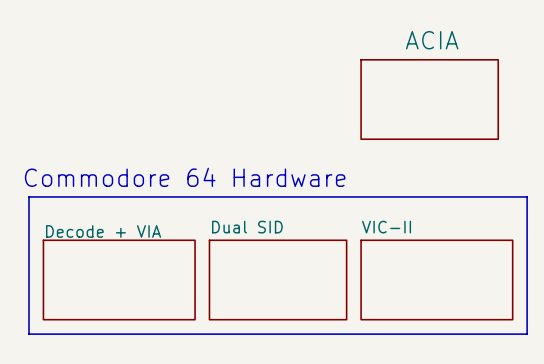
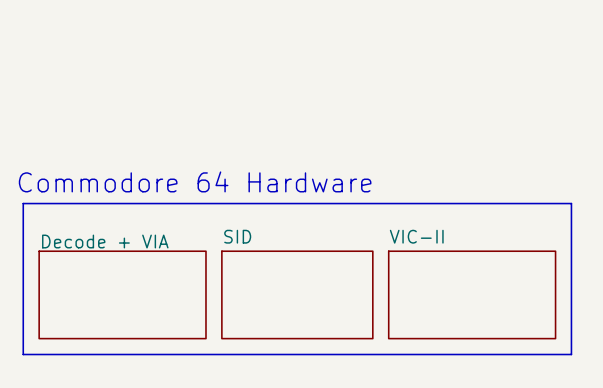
sheet ACIA: (429, 99) -> none
sheet Dual SID name: Dual SID (247, 227) -> SID (237, 236)

